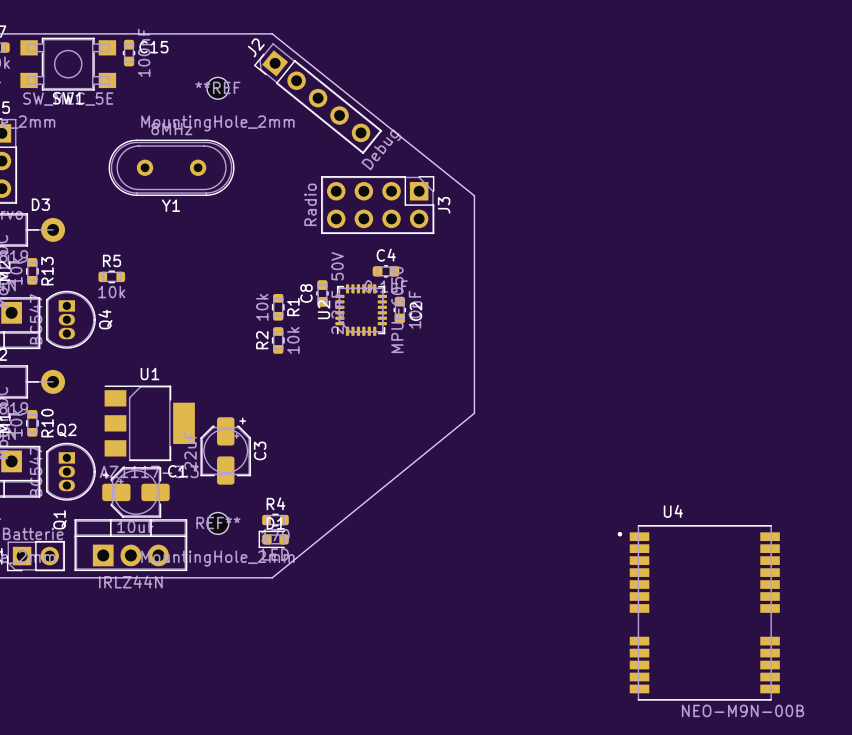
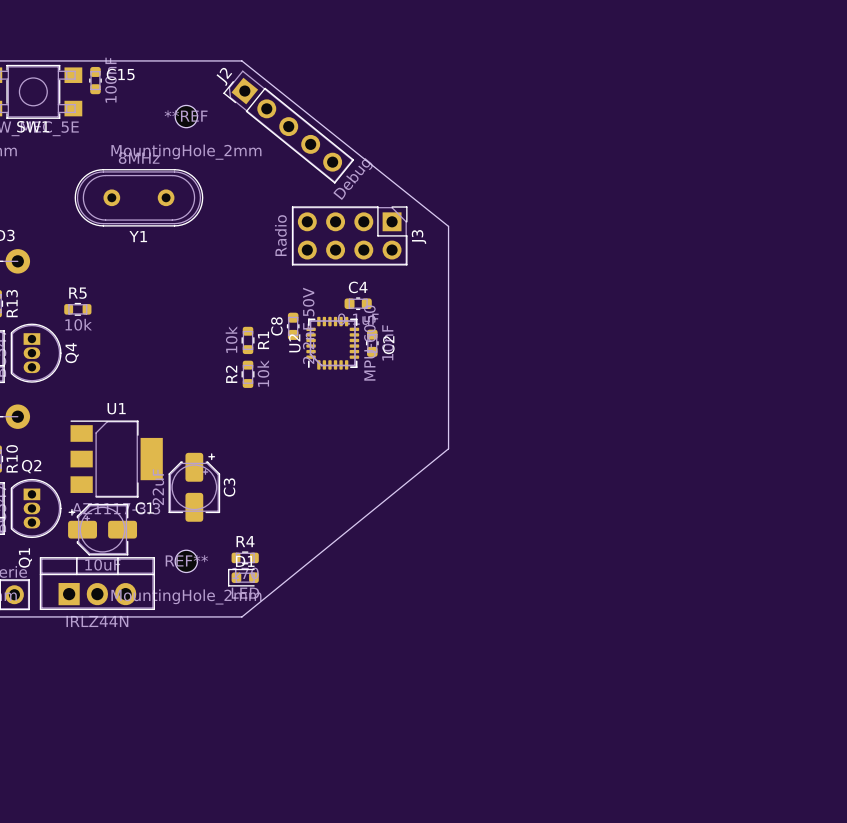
U4: NEO-M9N-00B (698, 612) -> none

